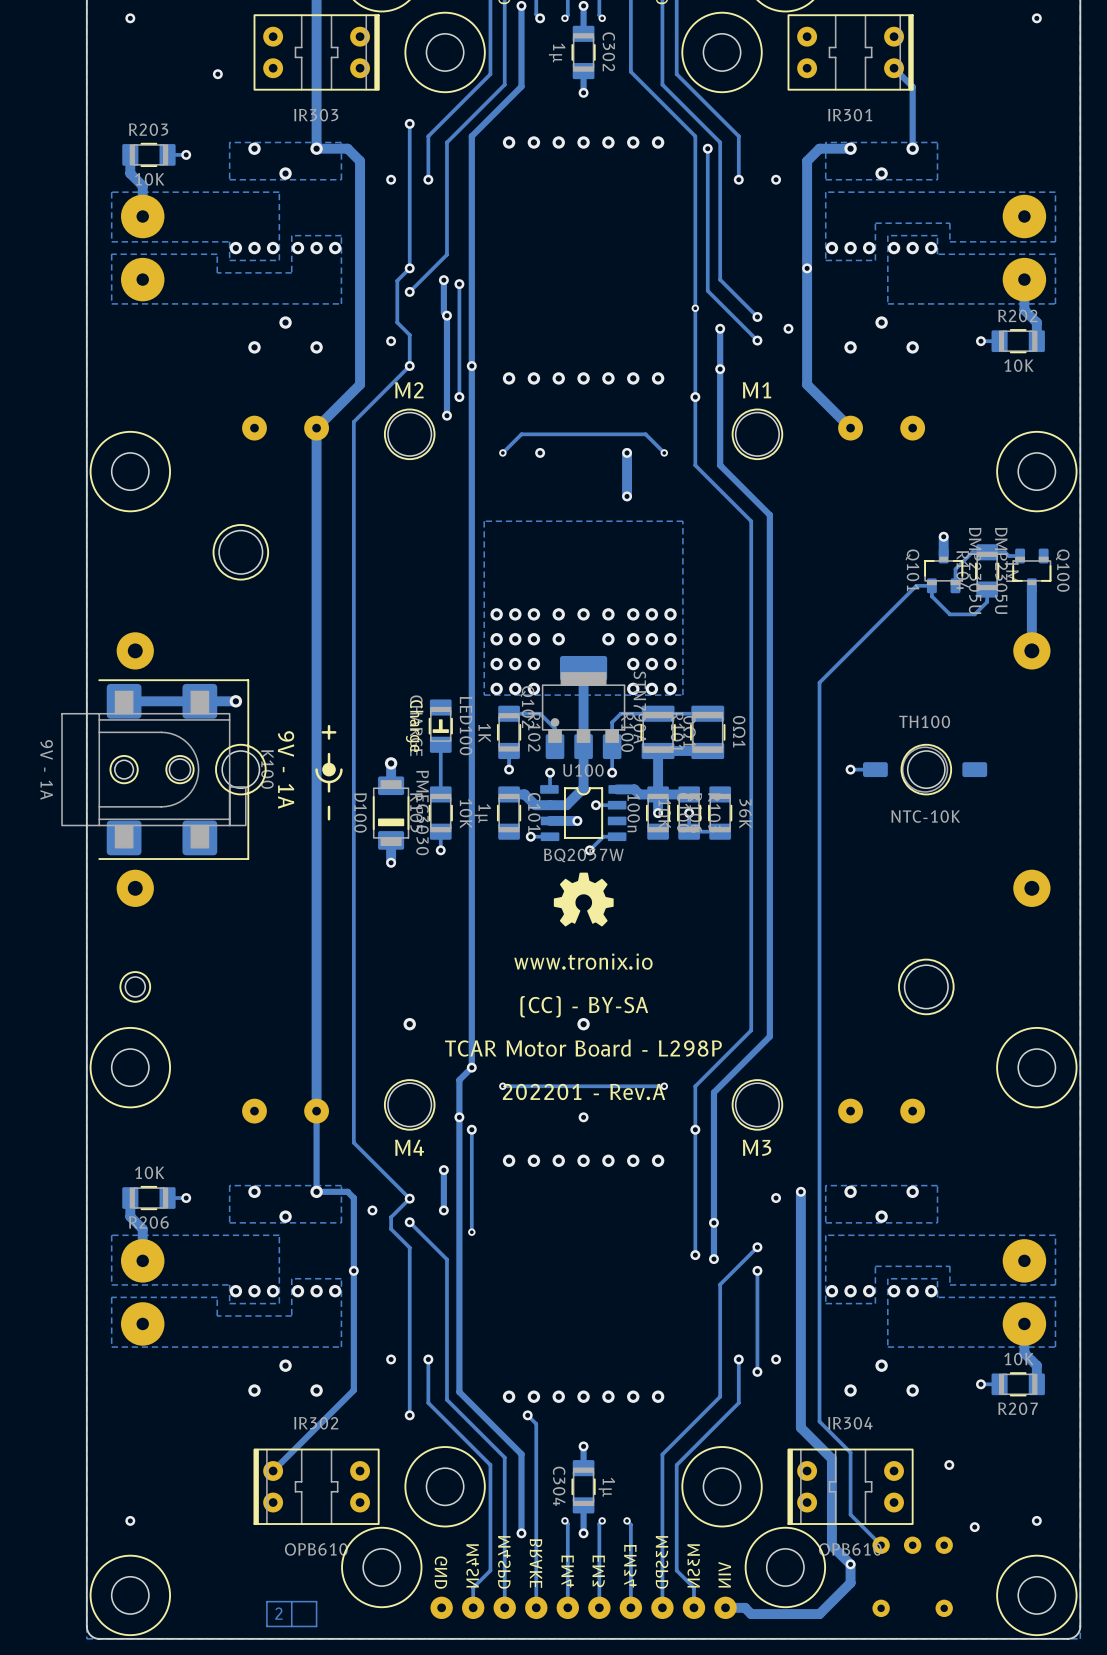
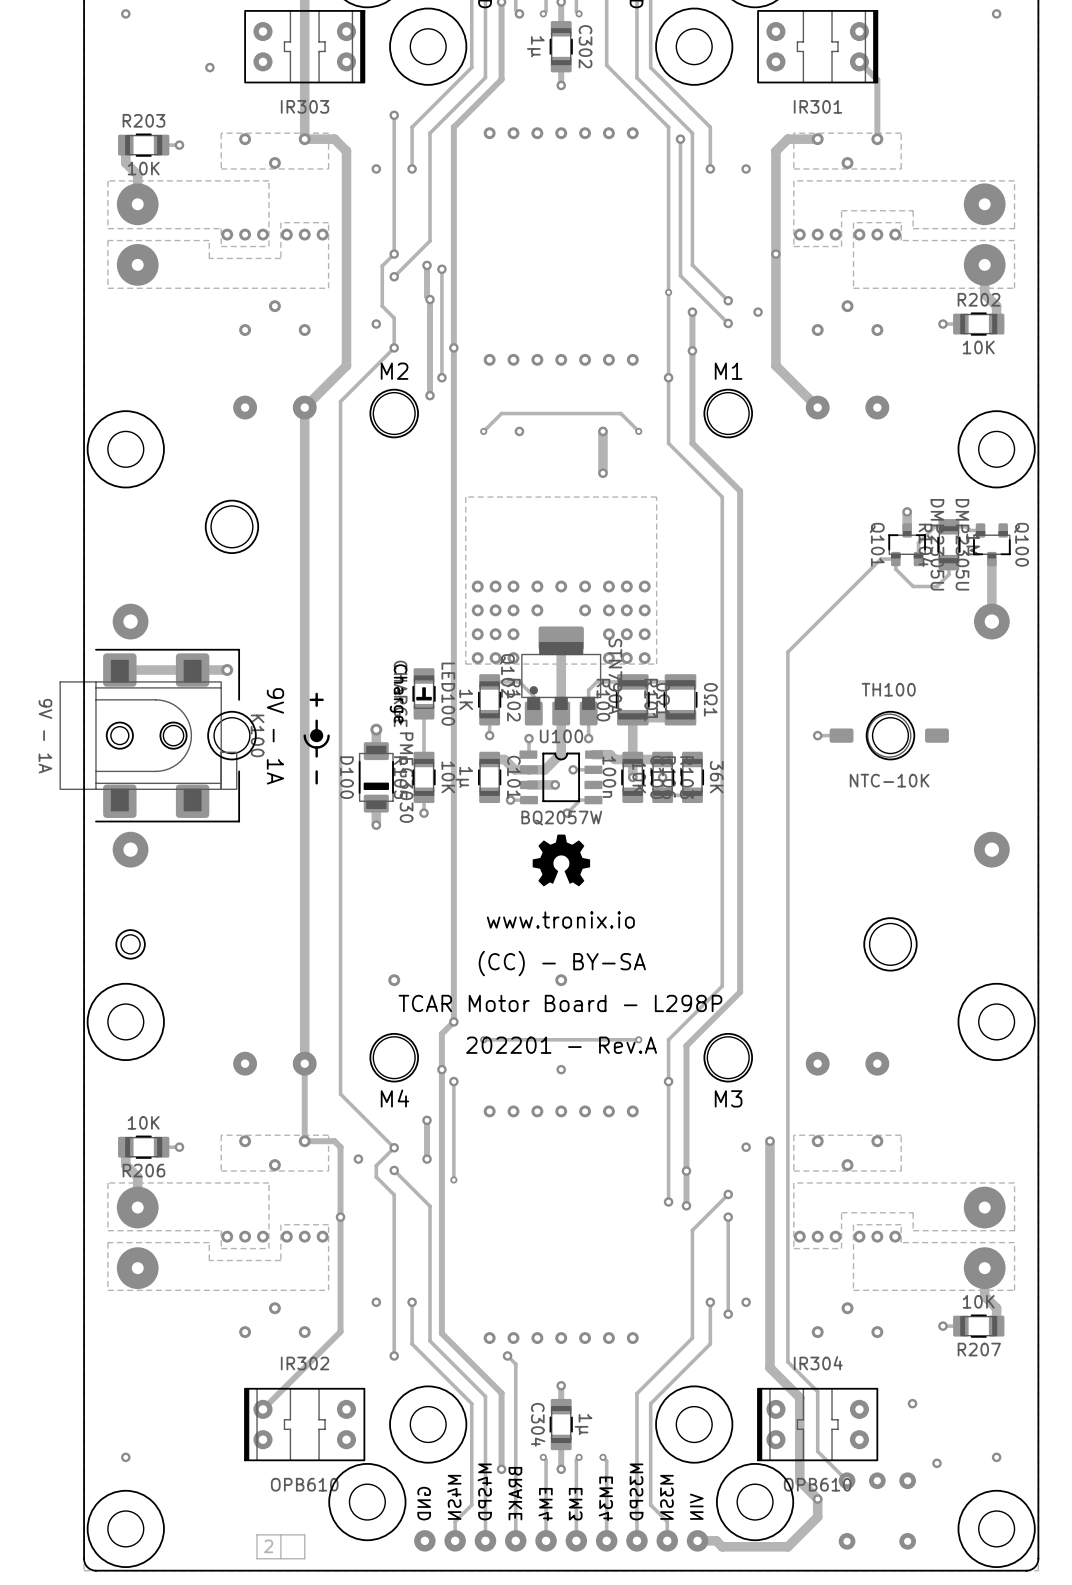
K100 footprint: [61, 679, 250, 860] -> [59, 648, 241, 823]

